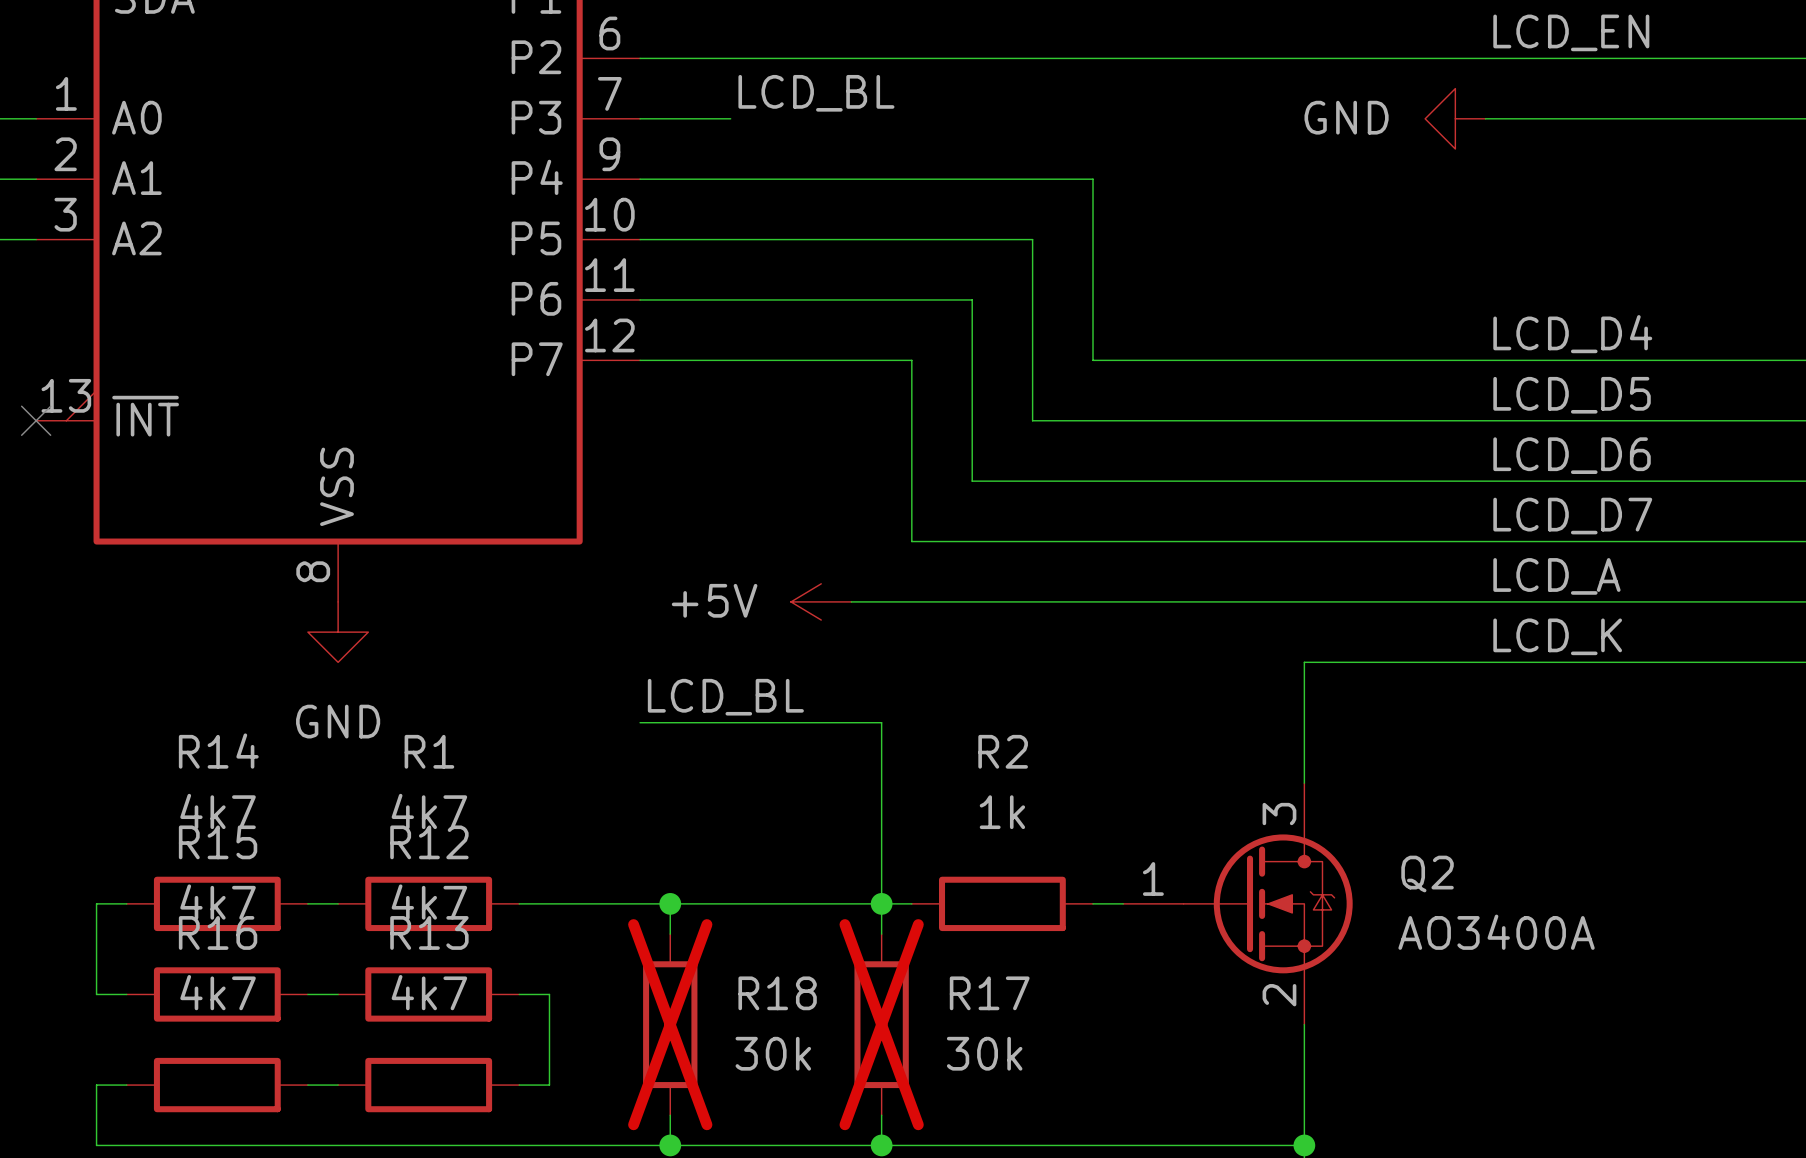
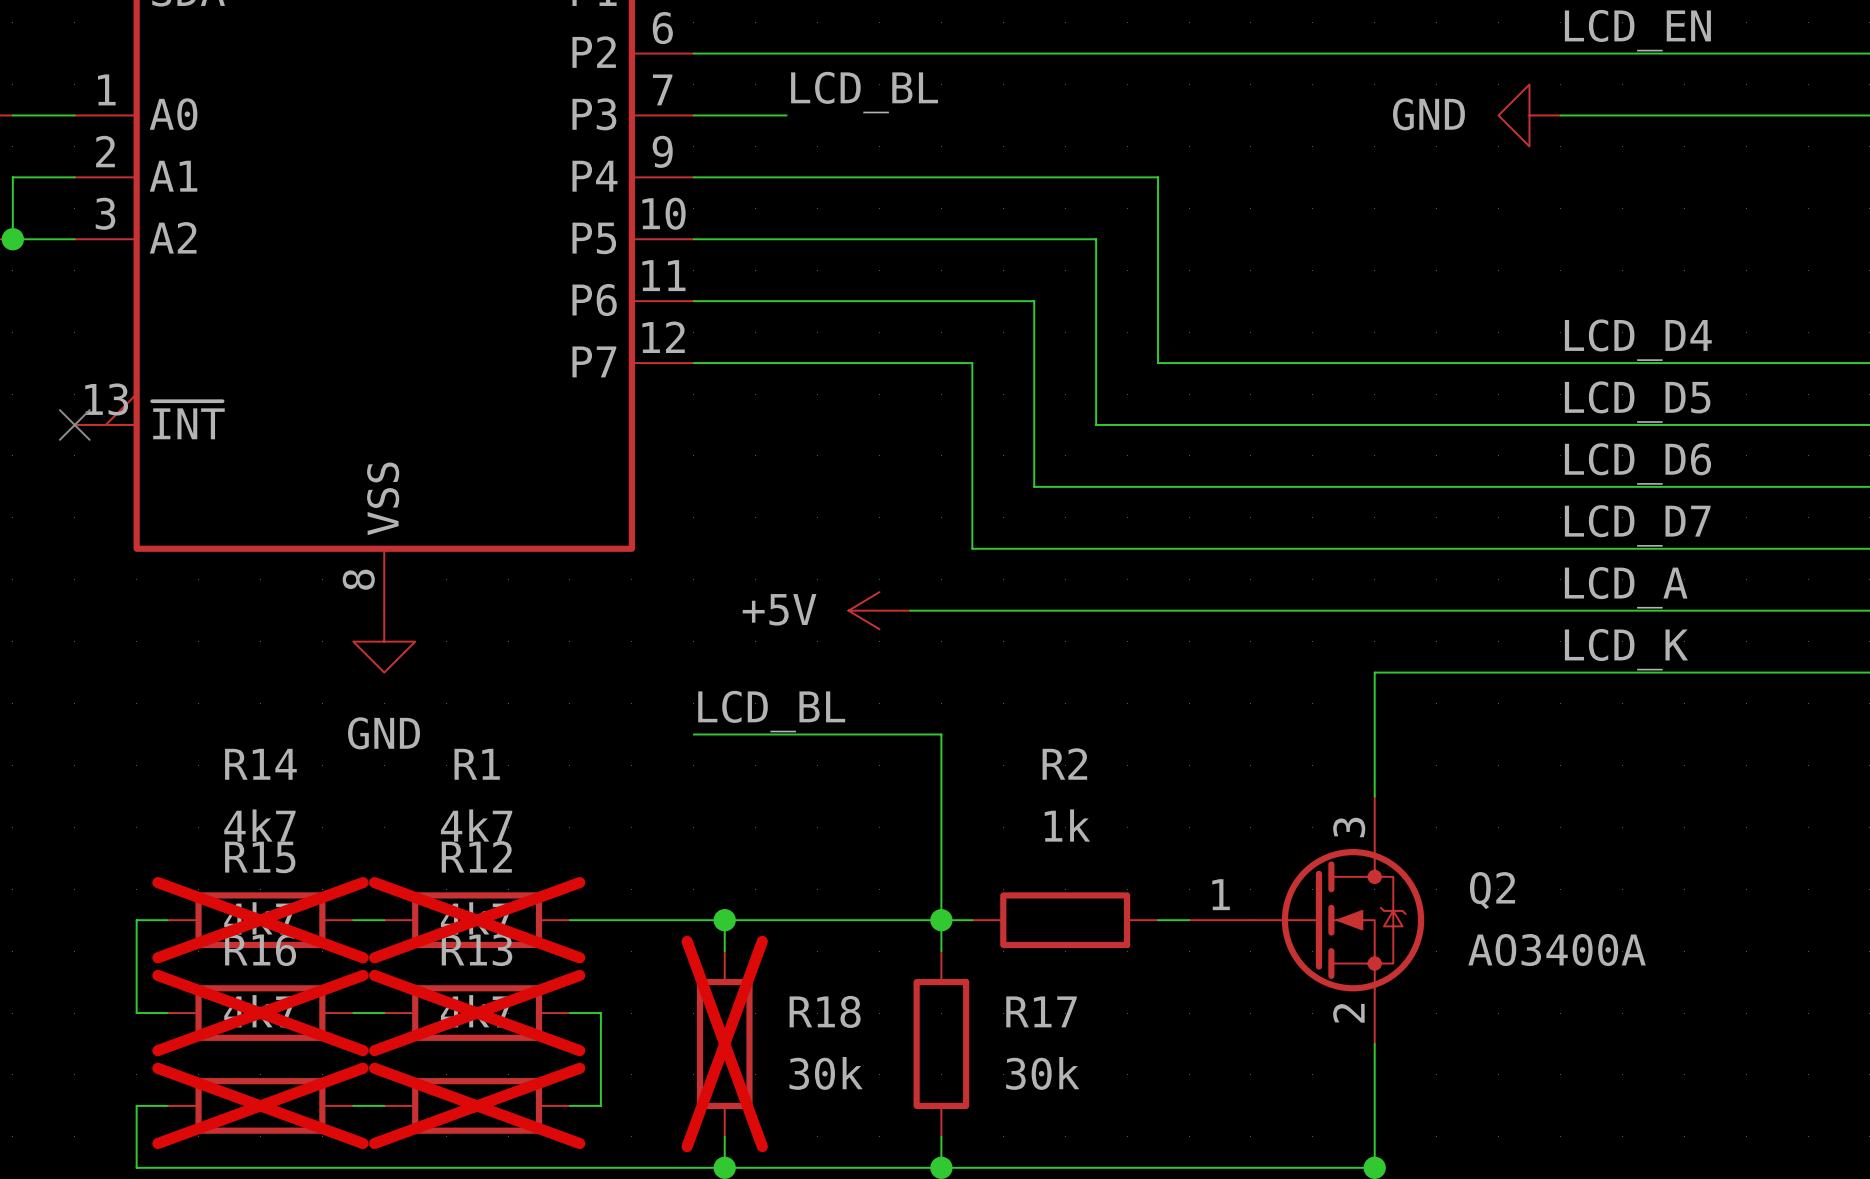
R14 do-not-place cross: none -> (260, 920)
R1 do-not-place cross: none -> (477, 920)
R15 do-not-place cross: none -> (260, 1013)
R12 do-not-place cross: none -> (477, 1013)
R17 do-not-place cross: (881, 1024) -> none
R16 do-not-place cross: none -> (260, 1105)
R13 do-not-place cross: none -> (477, 1105)

